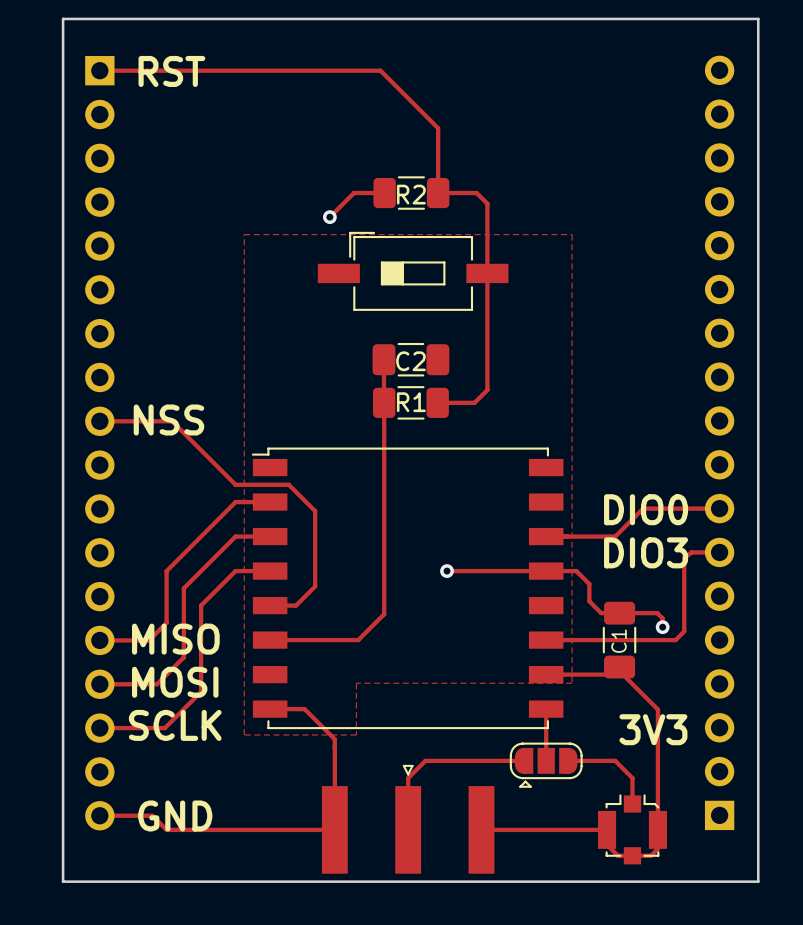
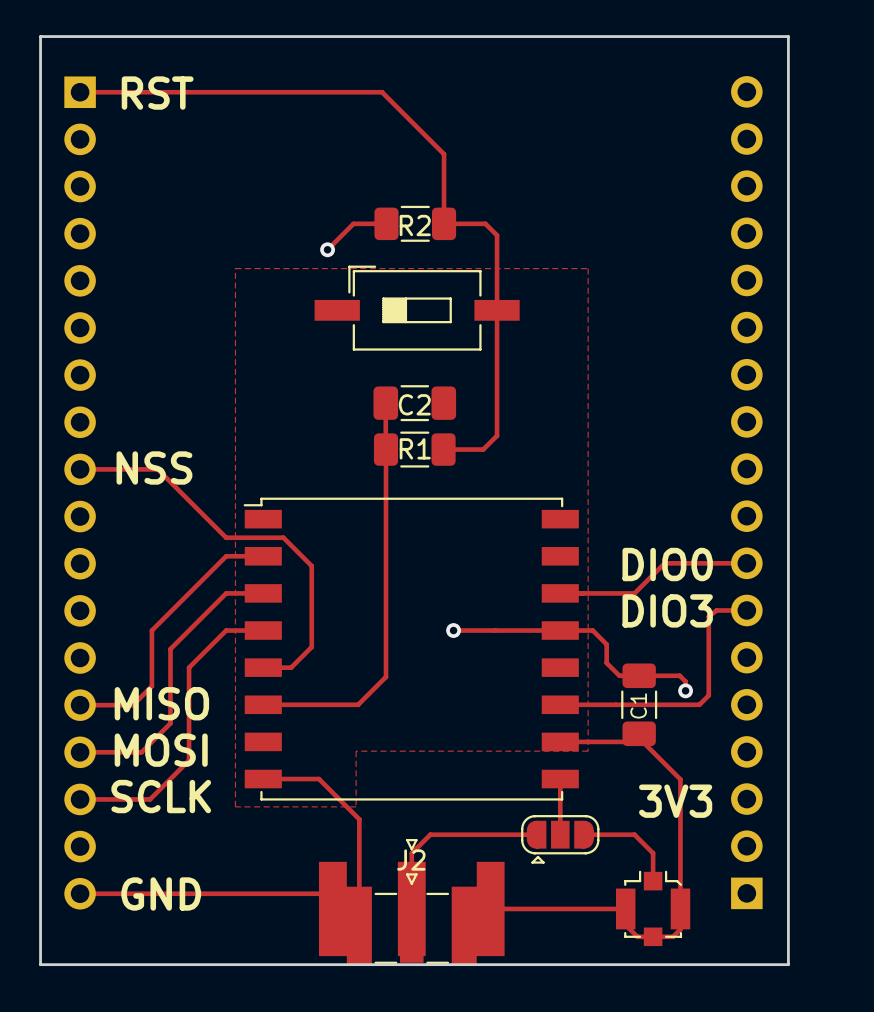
track: (304, 709) (334, 739) (334, 829) (166, 829) (152, 815) -> (300, 779) (318, 779) (359, 819) (359, 925) (327, 893) (136, 893)
J2: none -> (411, 918)

